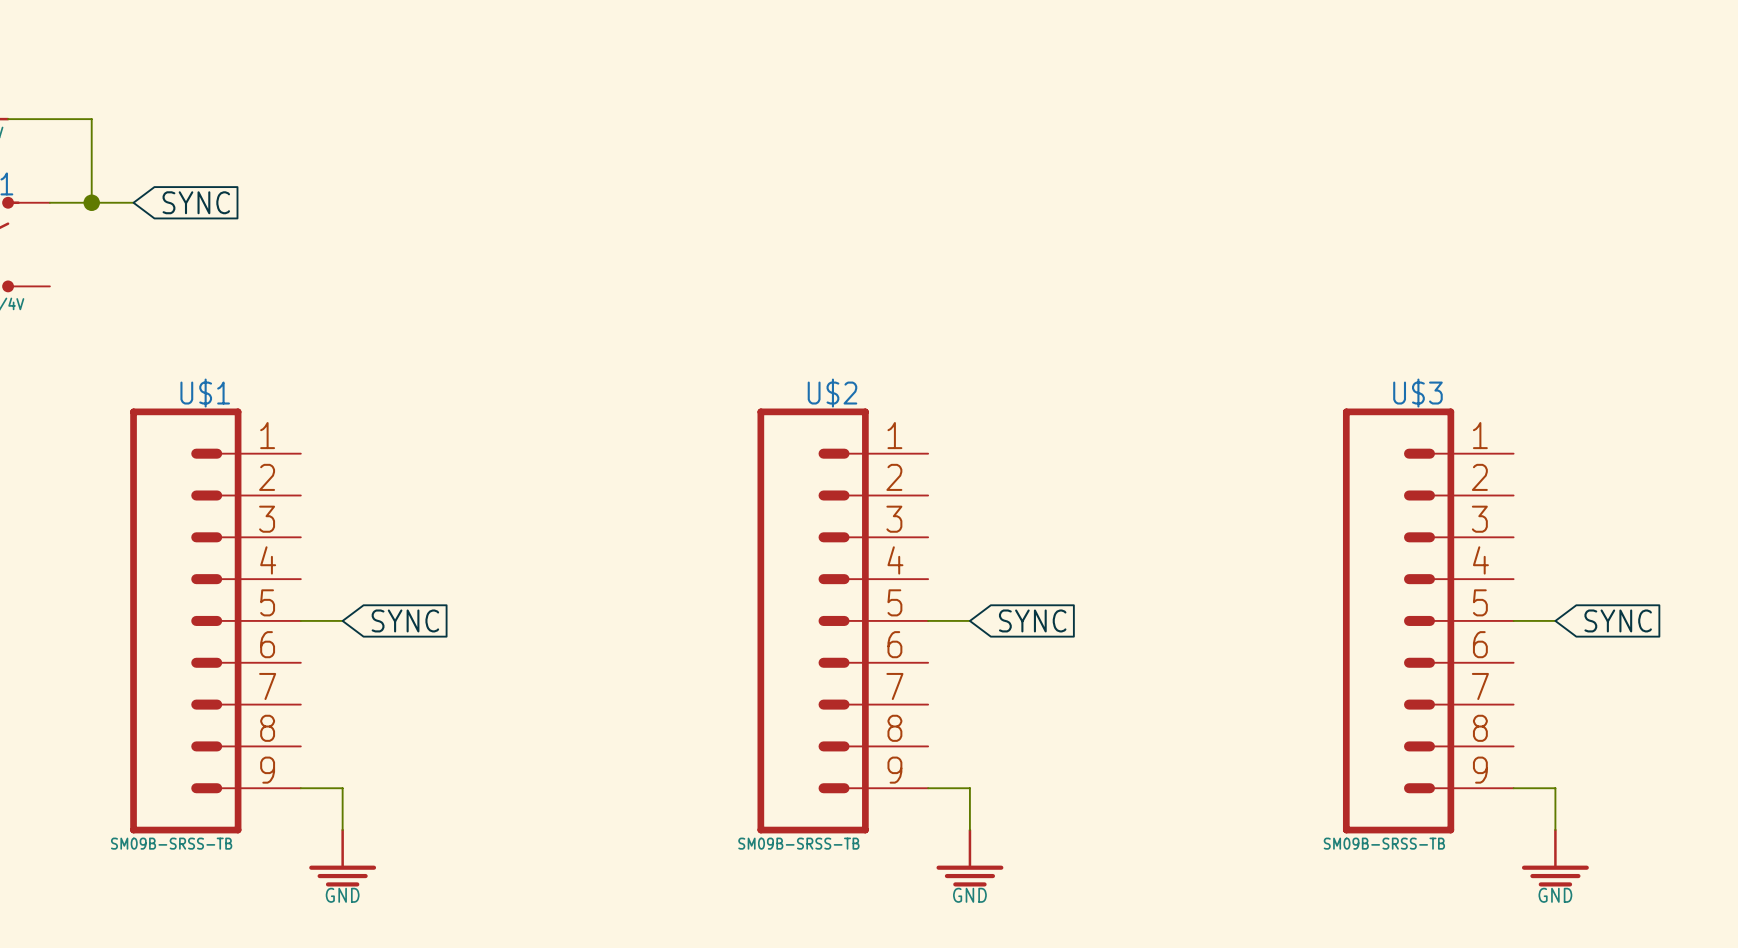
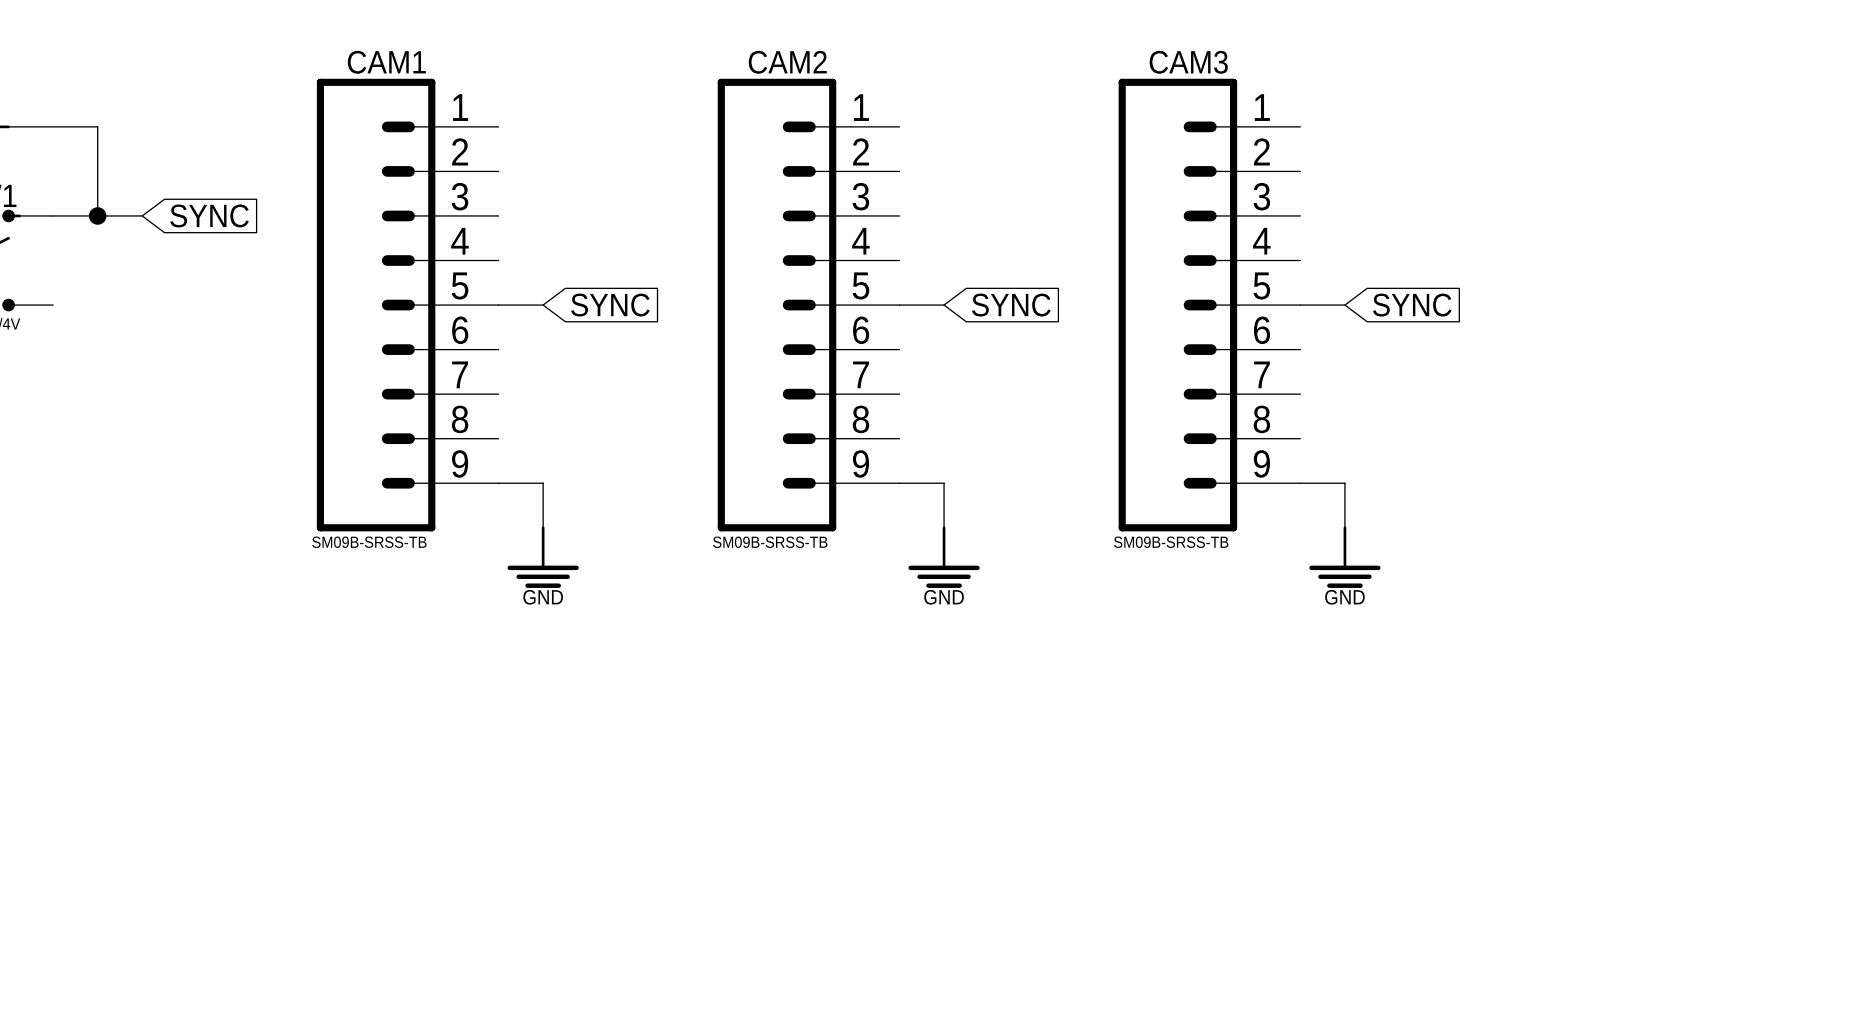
CAM1: none -> SM09B-SRSS-TB (407, 305)
global label: none -> SYNC (610, 305)
CAM2: none -> SM09B-SRSS-TB (808, 305)
global label: none -> SYNC (1011, 305)
CAM3: none -> SM09B-SRSS-TB (1209, 305)
wire: none -> (1300, 305) (1344, 305)
global label: none -> SYNC (1412, 305)
wire: none -> (1300, 483) (1344, 483) (1344, 527)
power symbol: none -> (543, 557)
power symbol: none -> (944, 557)
power symbol: none -> (1344, 557)
U$1: SM09B-SRSS-TB (215, 620) -> none
wire: (300, 620) (342, 620) -> (498, 305) (543, 305)
global label: SYNC (405, 620) -> none
U$2: SM09B-SRSS-TB (842, 620) -> none
wire: (928, 620) (969, 620) -> (899, 305) (944, 305)
global label: SYNC (1032, 620) -> none
U$3: SM09B-SRSS-TB (1428, 620) -> none
wire: (1513, 620) (1555, 620) -> none
global label: SYNC (1618, 620) -> none
wire: (300, 788) (342, 788) (342, 830) -> (498, 483) (543, 483) (543, 527)
wire: (928, 788) (969, 788) (969, 830) -> (899, 483) (944, 483) (944, 527)
wire: (1513, 788) (1555, 788) (1555, 830) -> none
power symbol: (342, 857) -> none
power symbol: (969, 857) -> none
power symbol: (1555, 857) -> none

